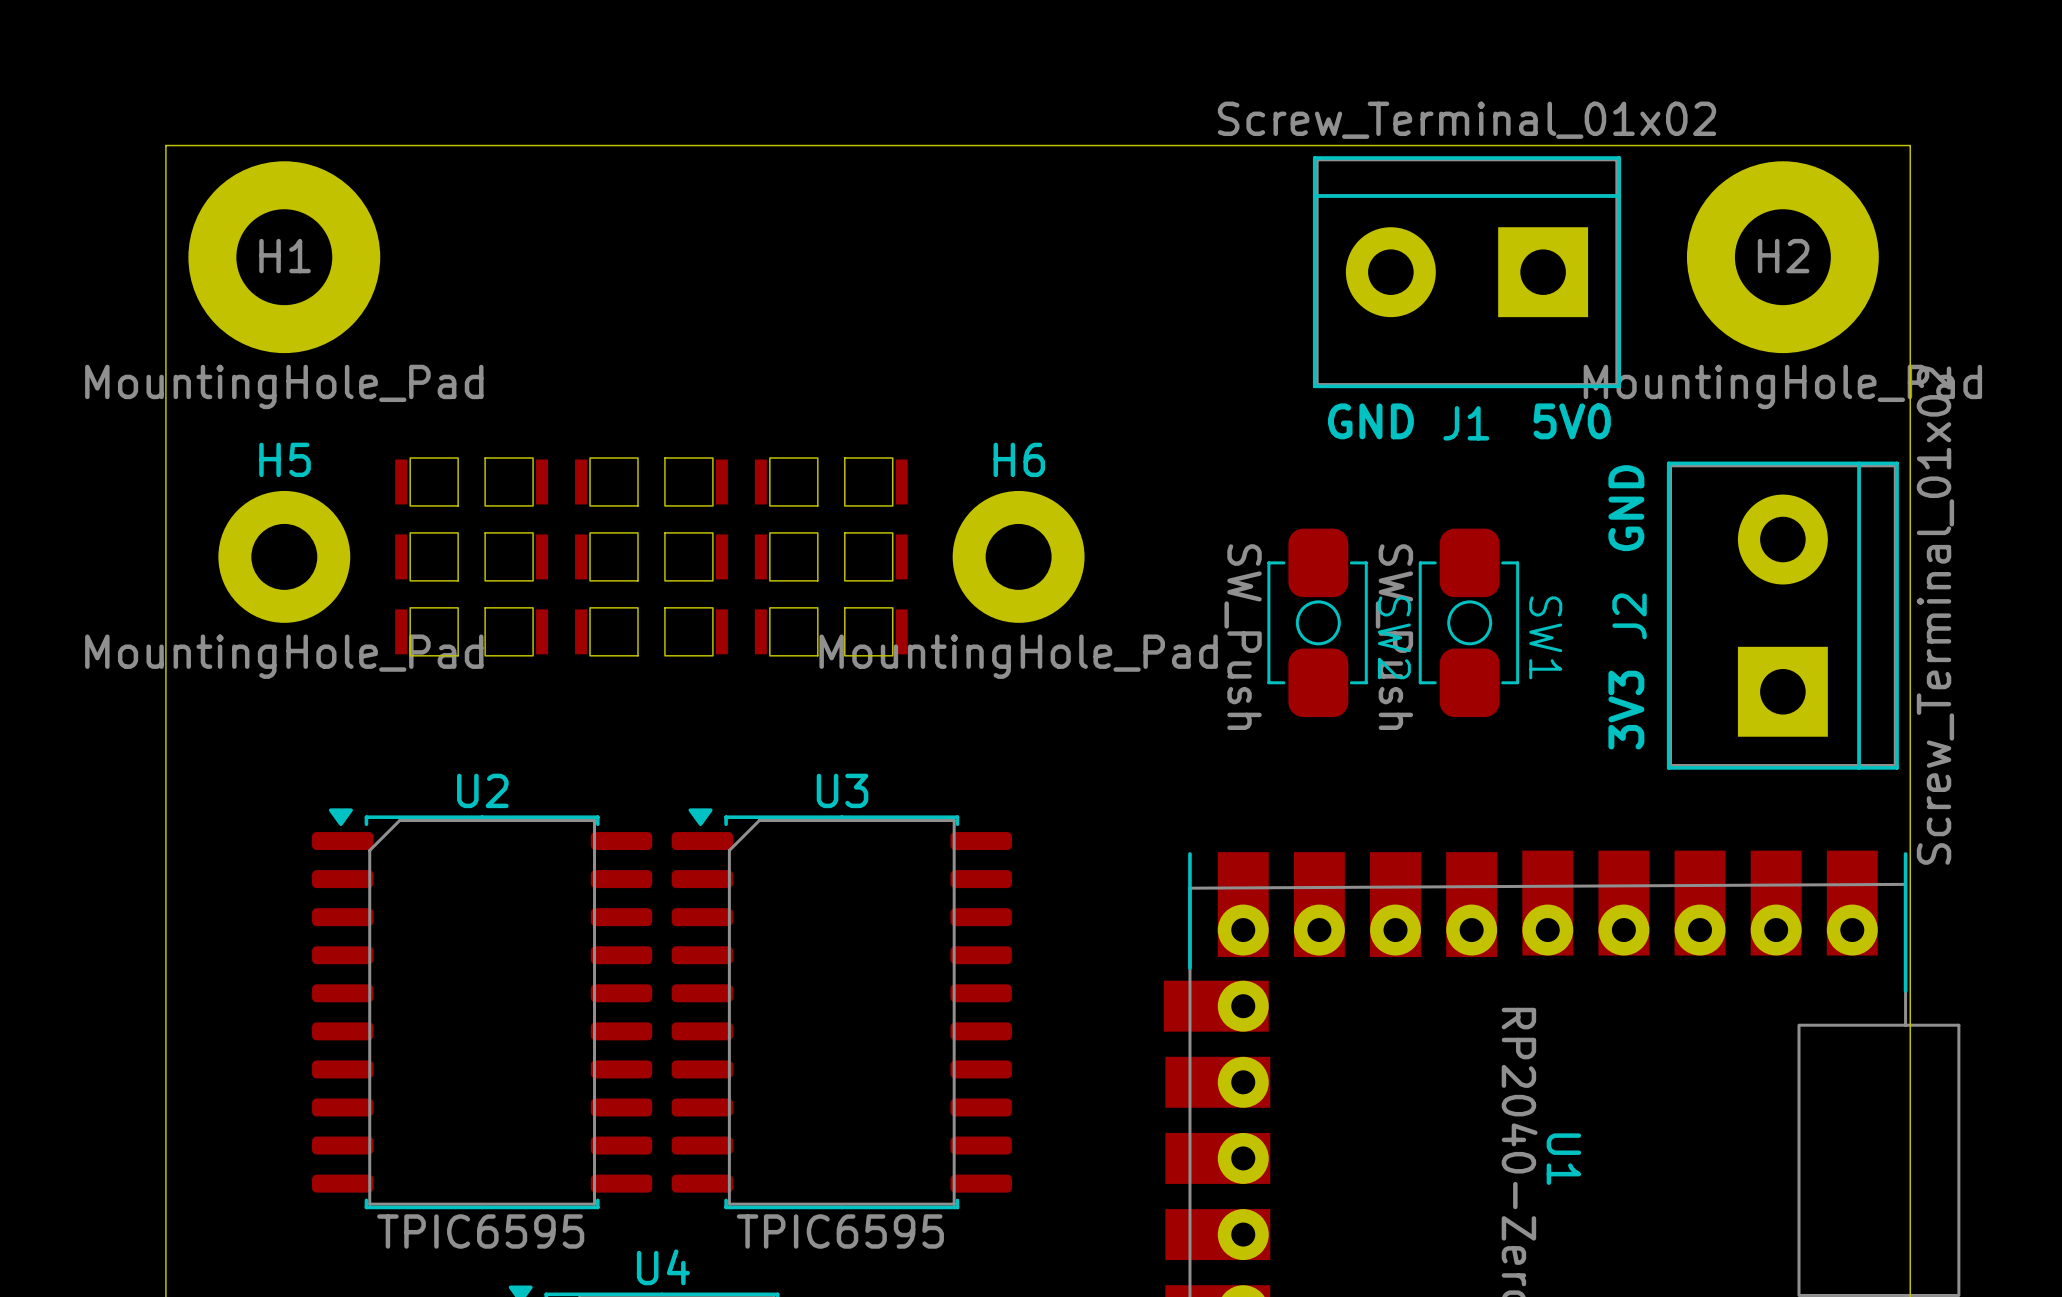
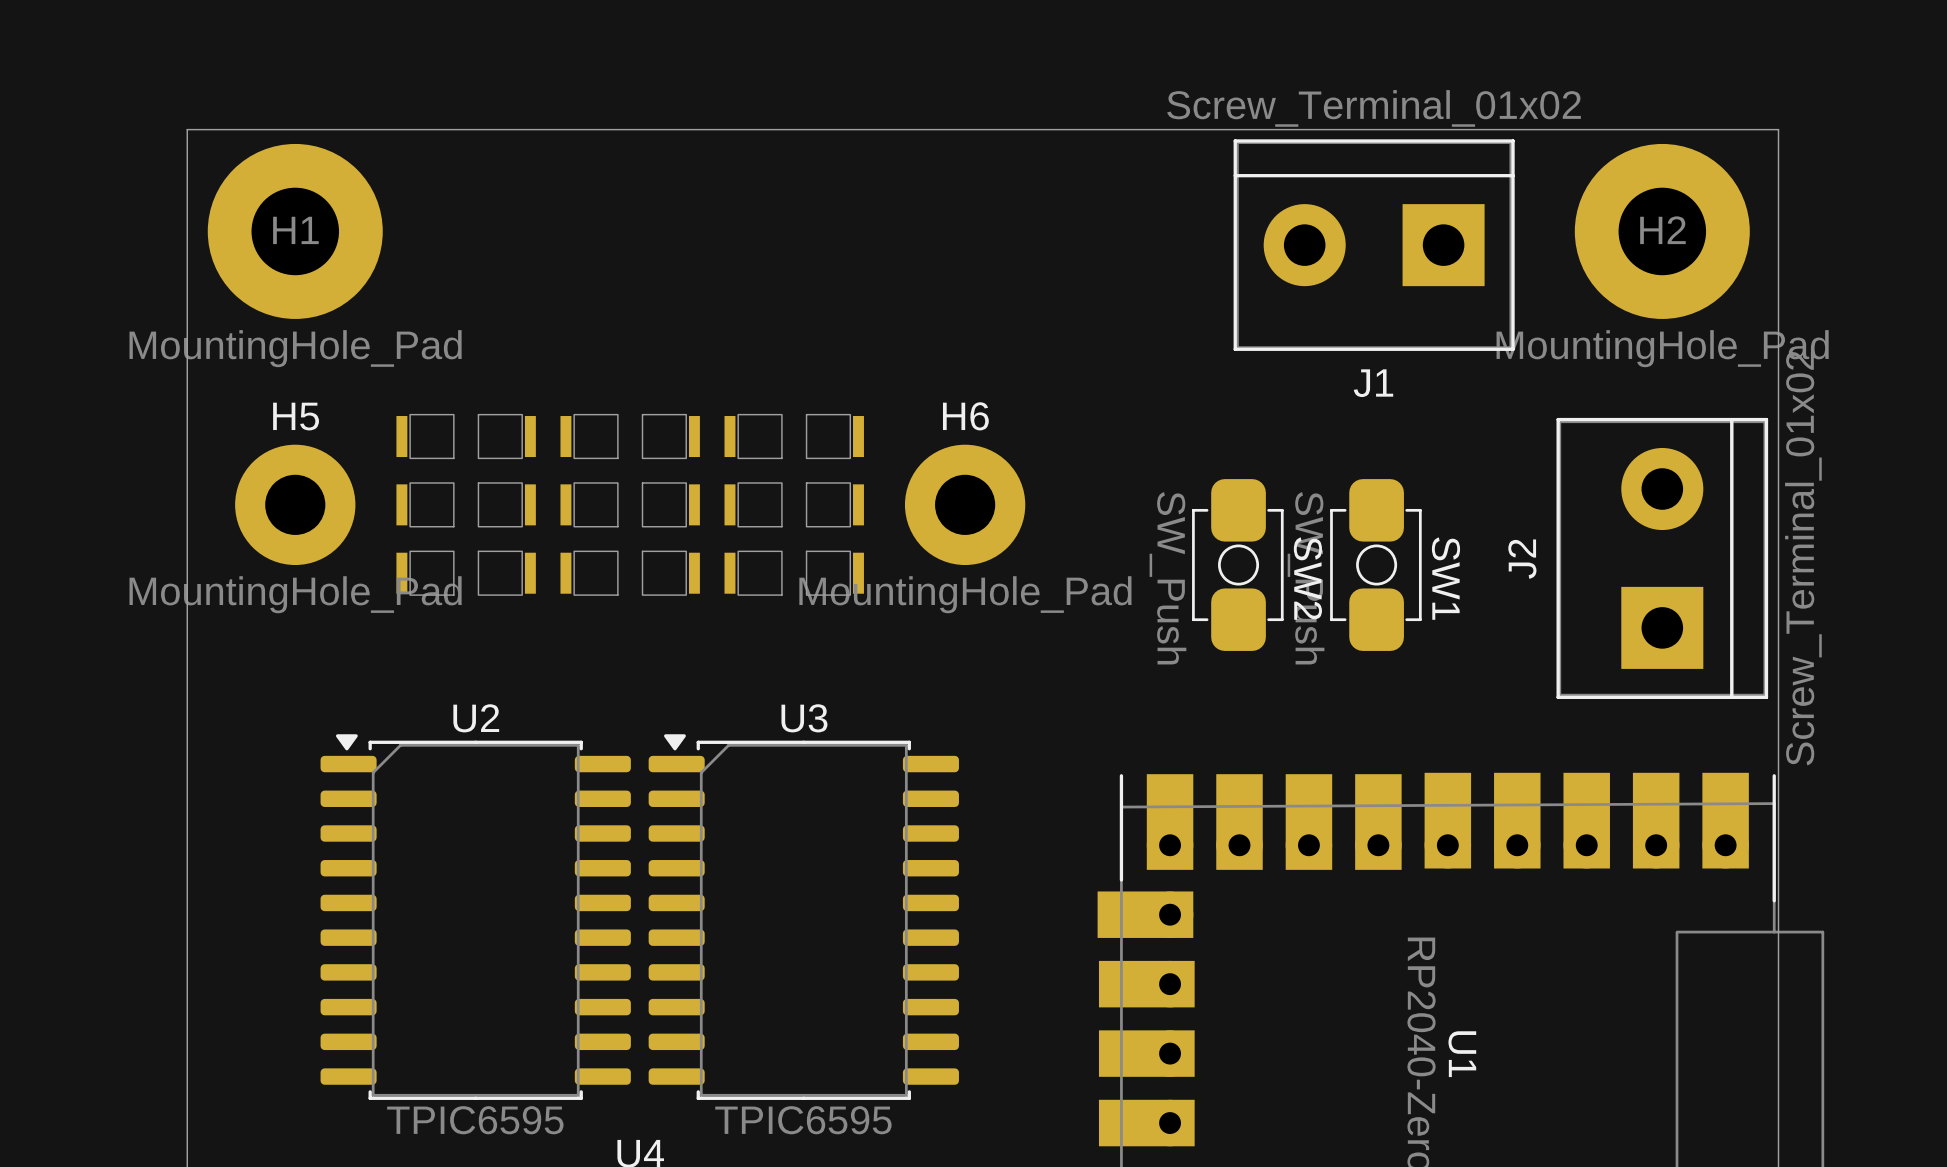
text: GND 5V0 (1469, 421) -> none
text: 3V3 GND (1626, 607) -> none

